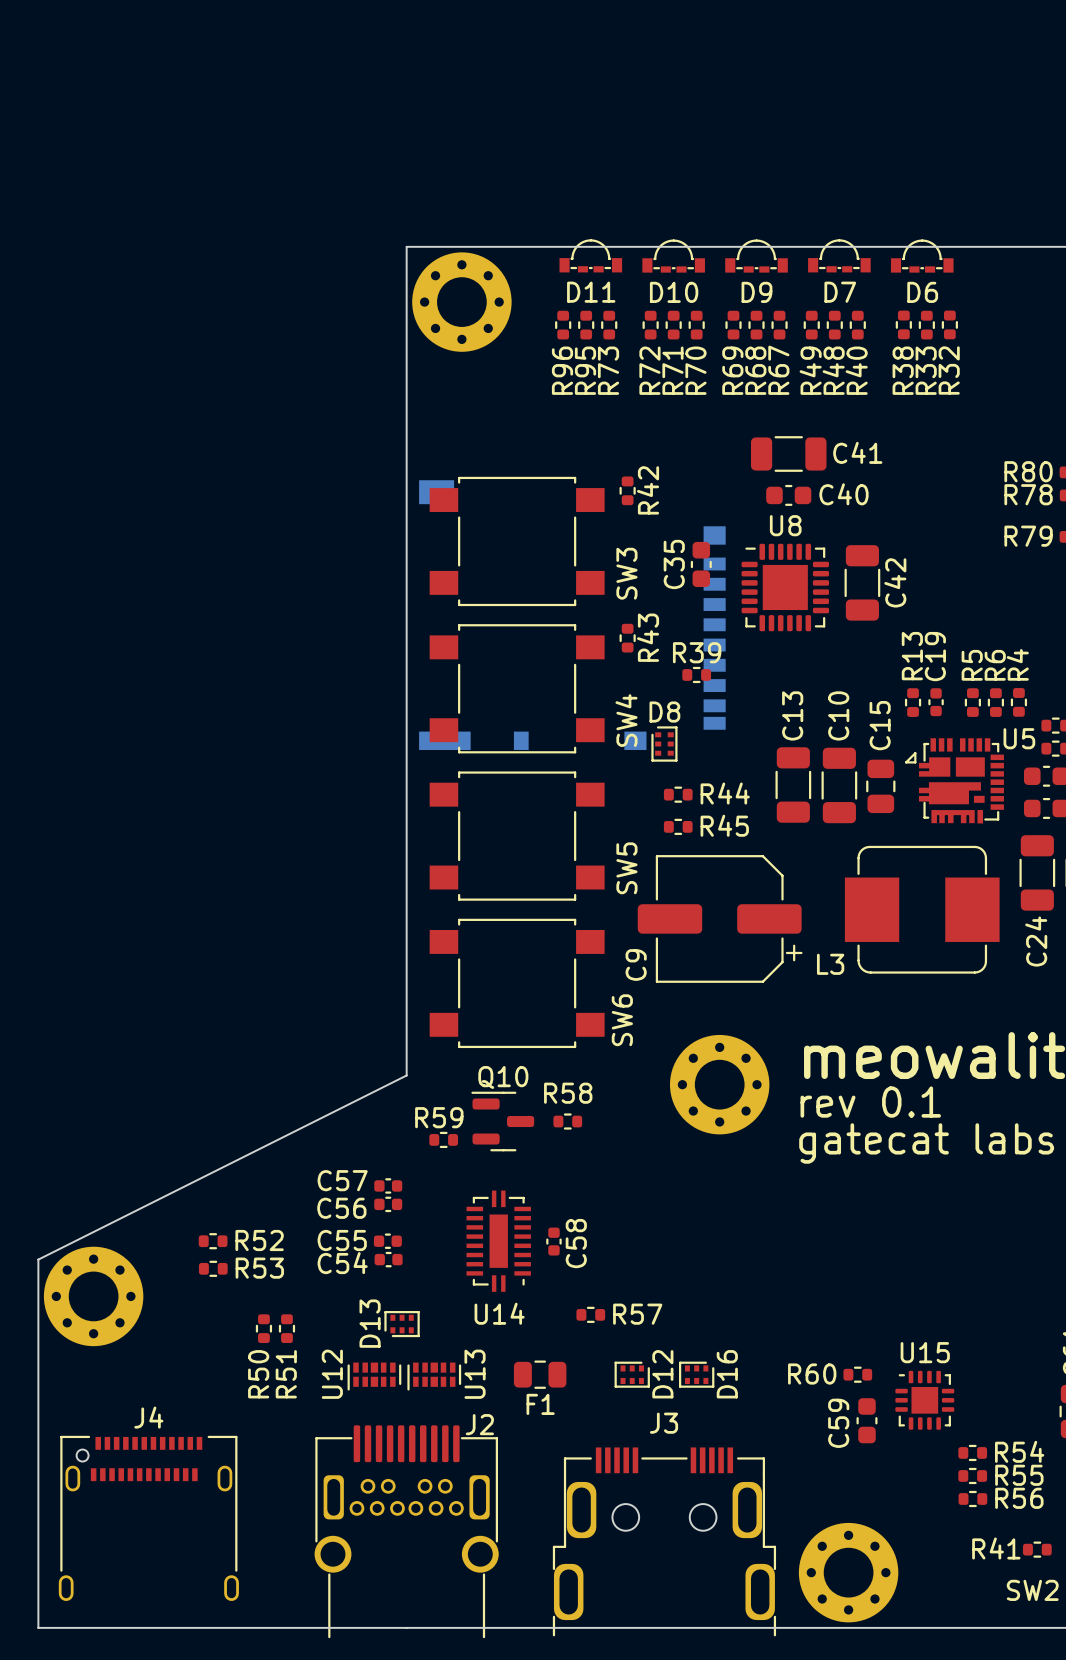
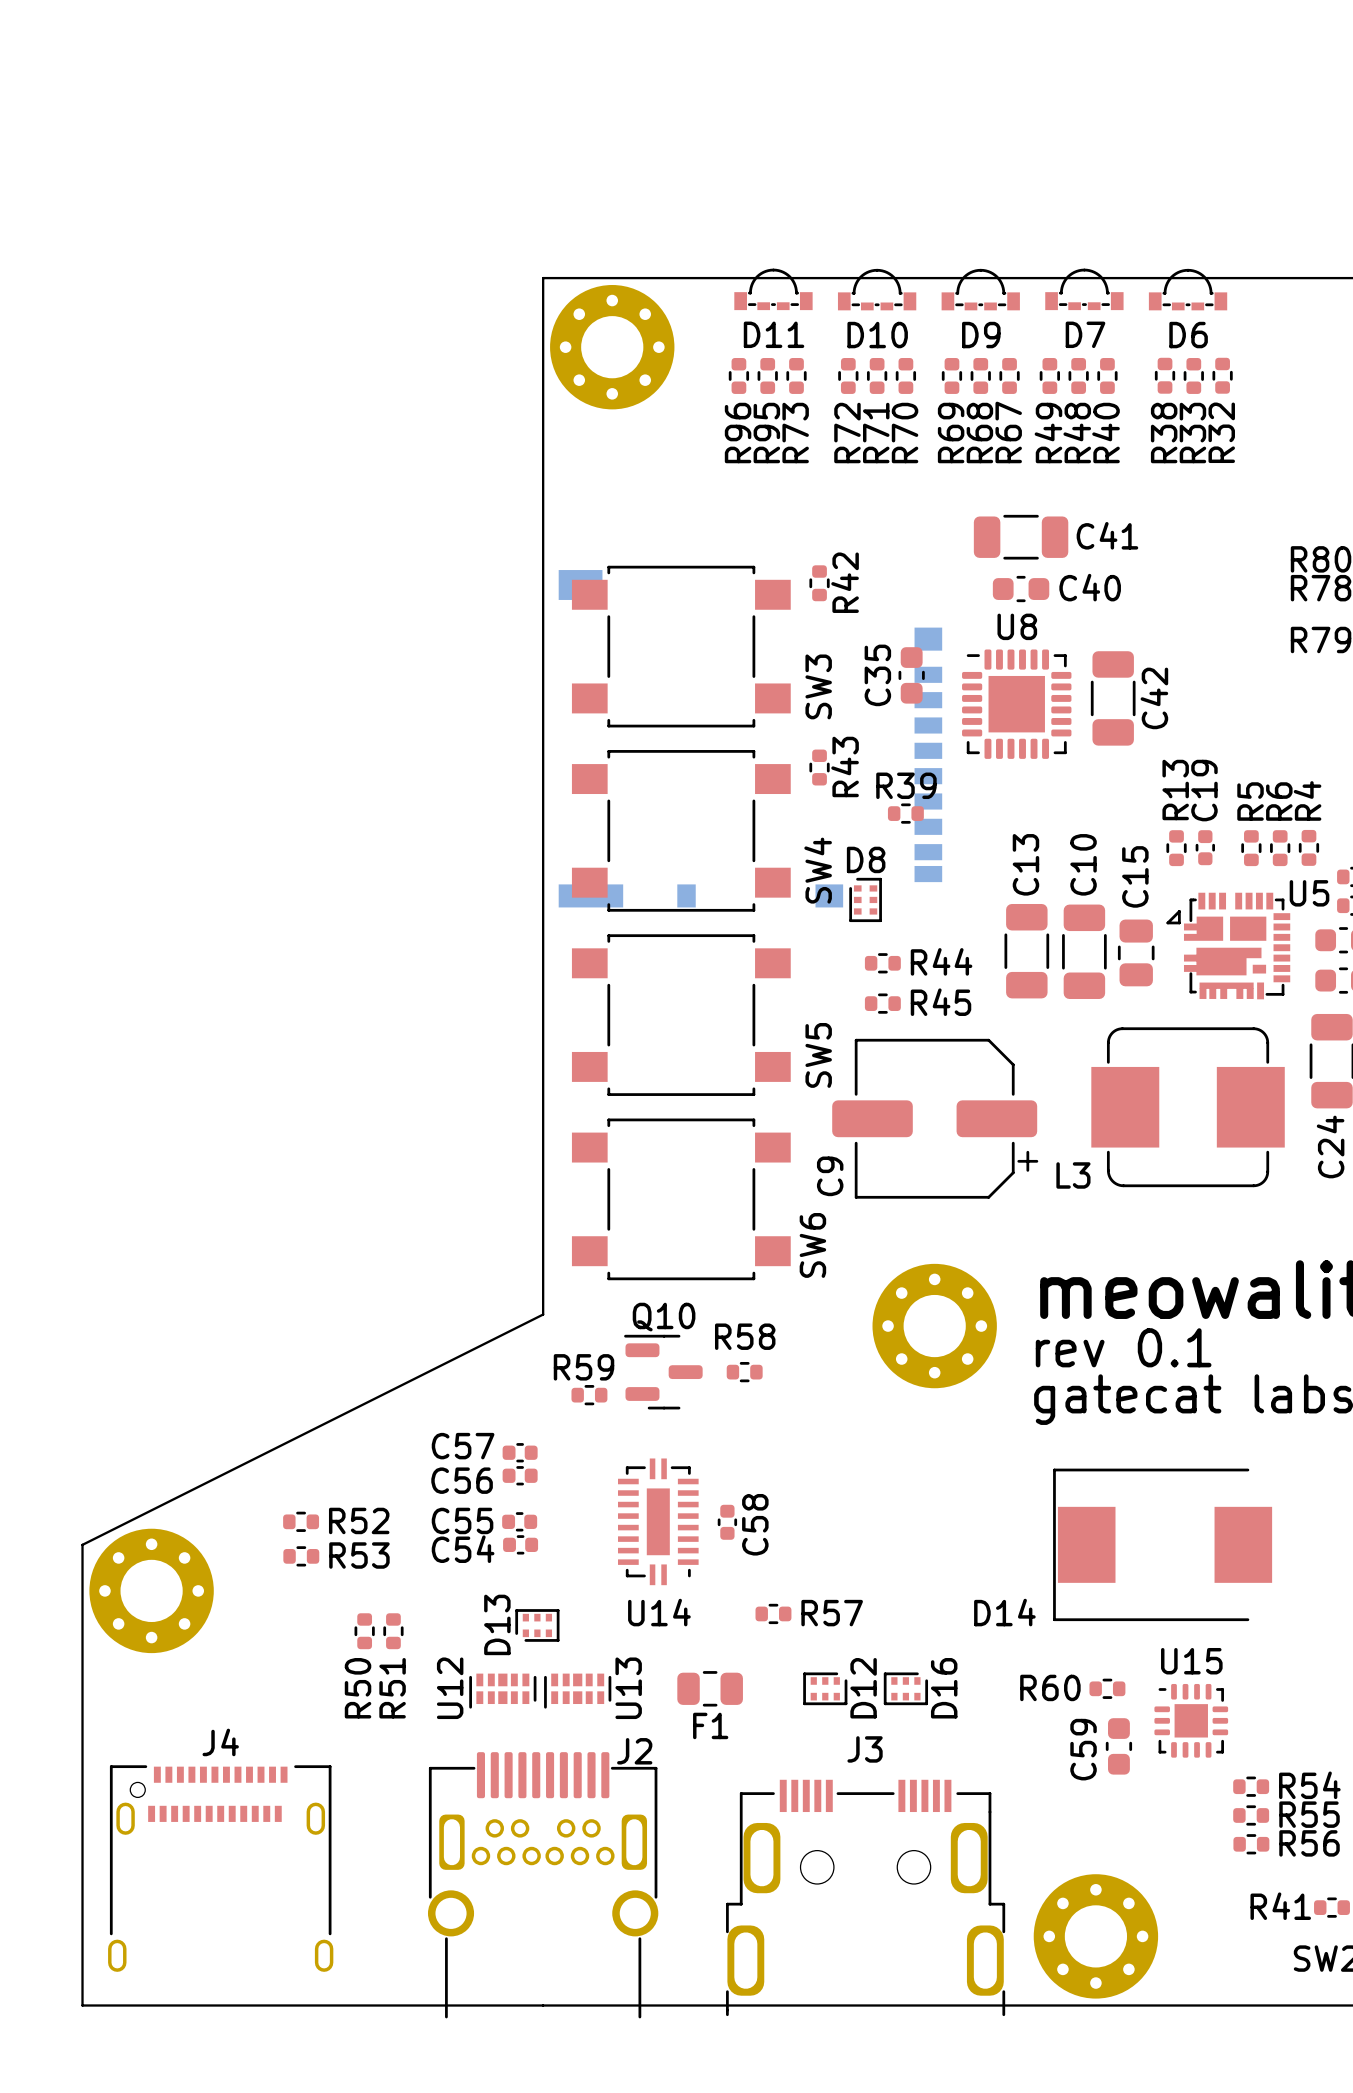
D14: none -> (1162, 1544)

